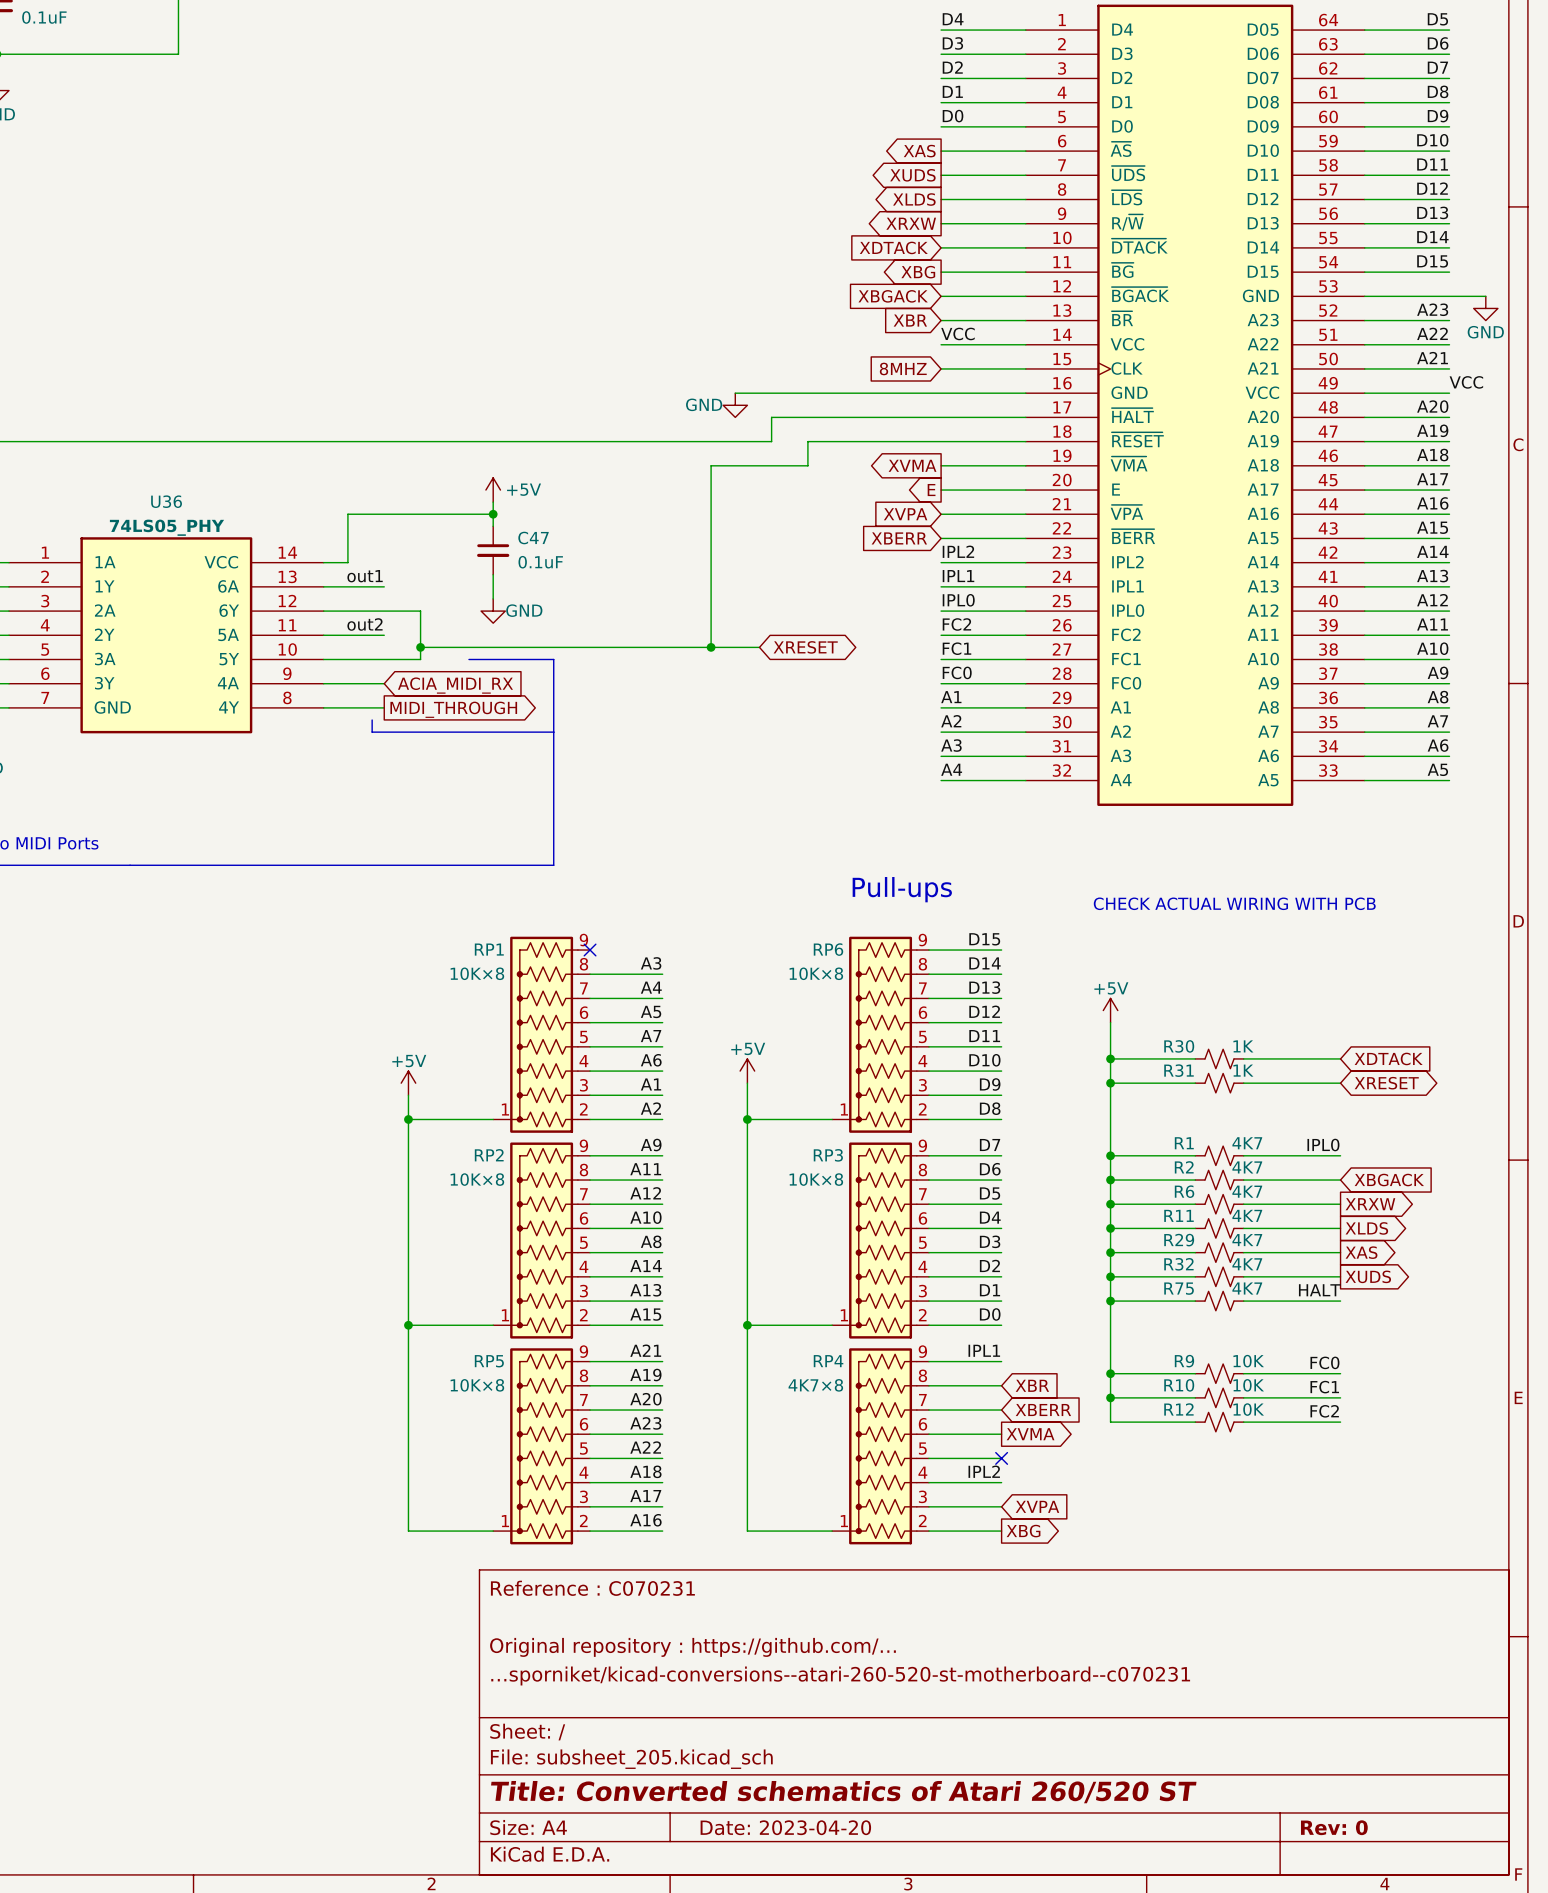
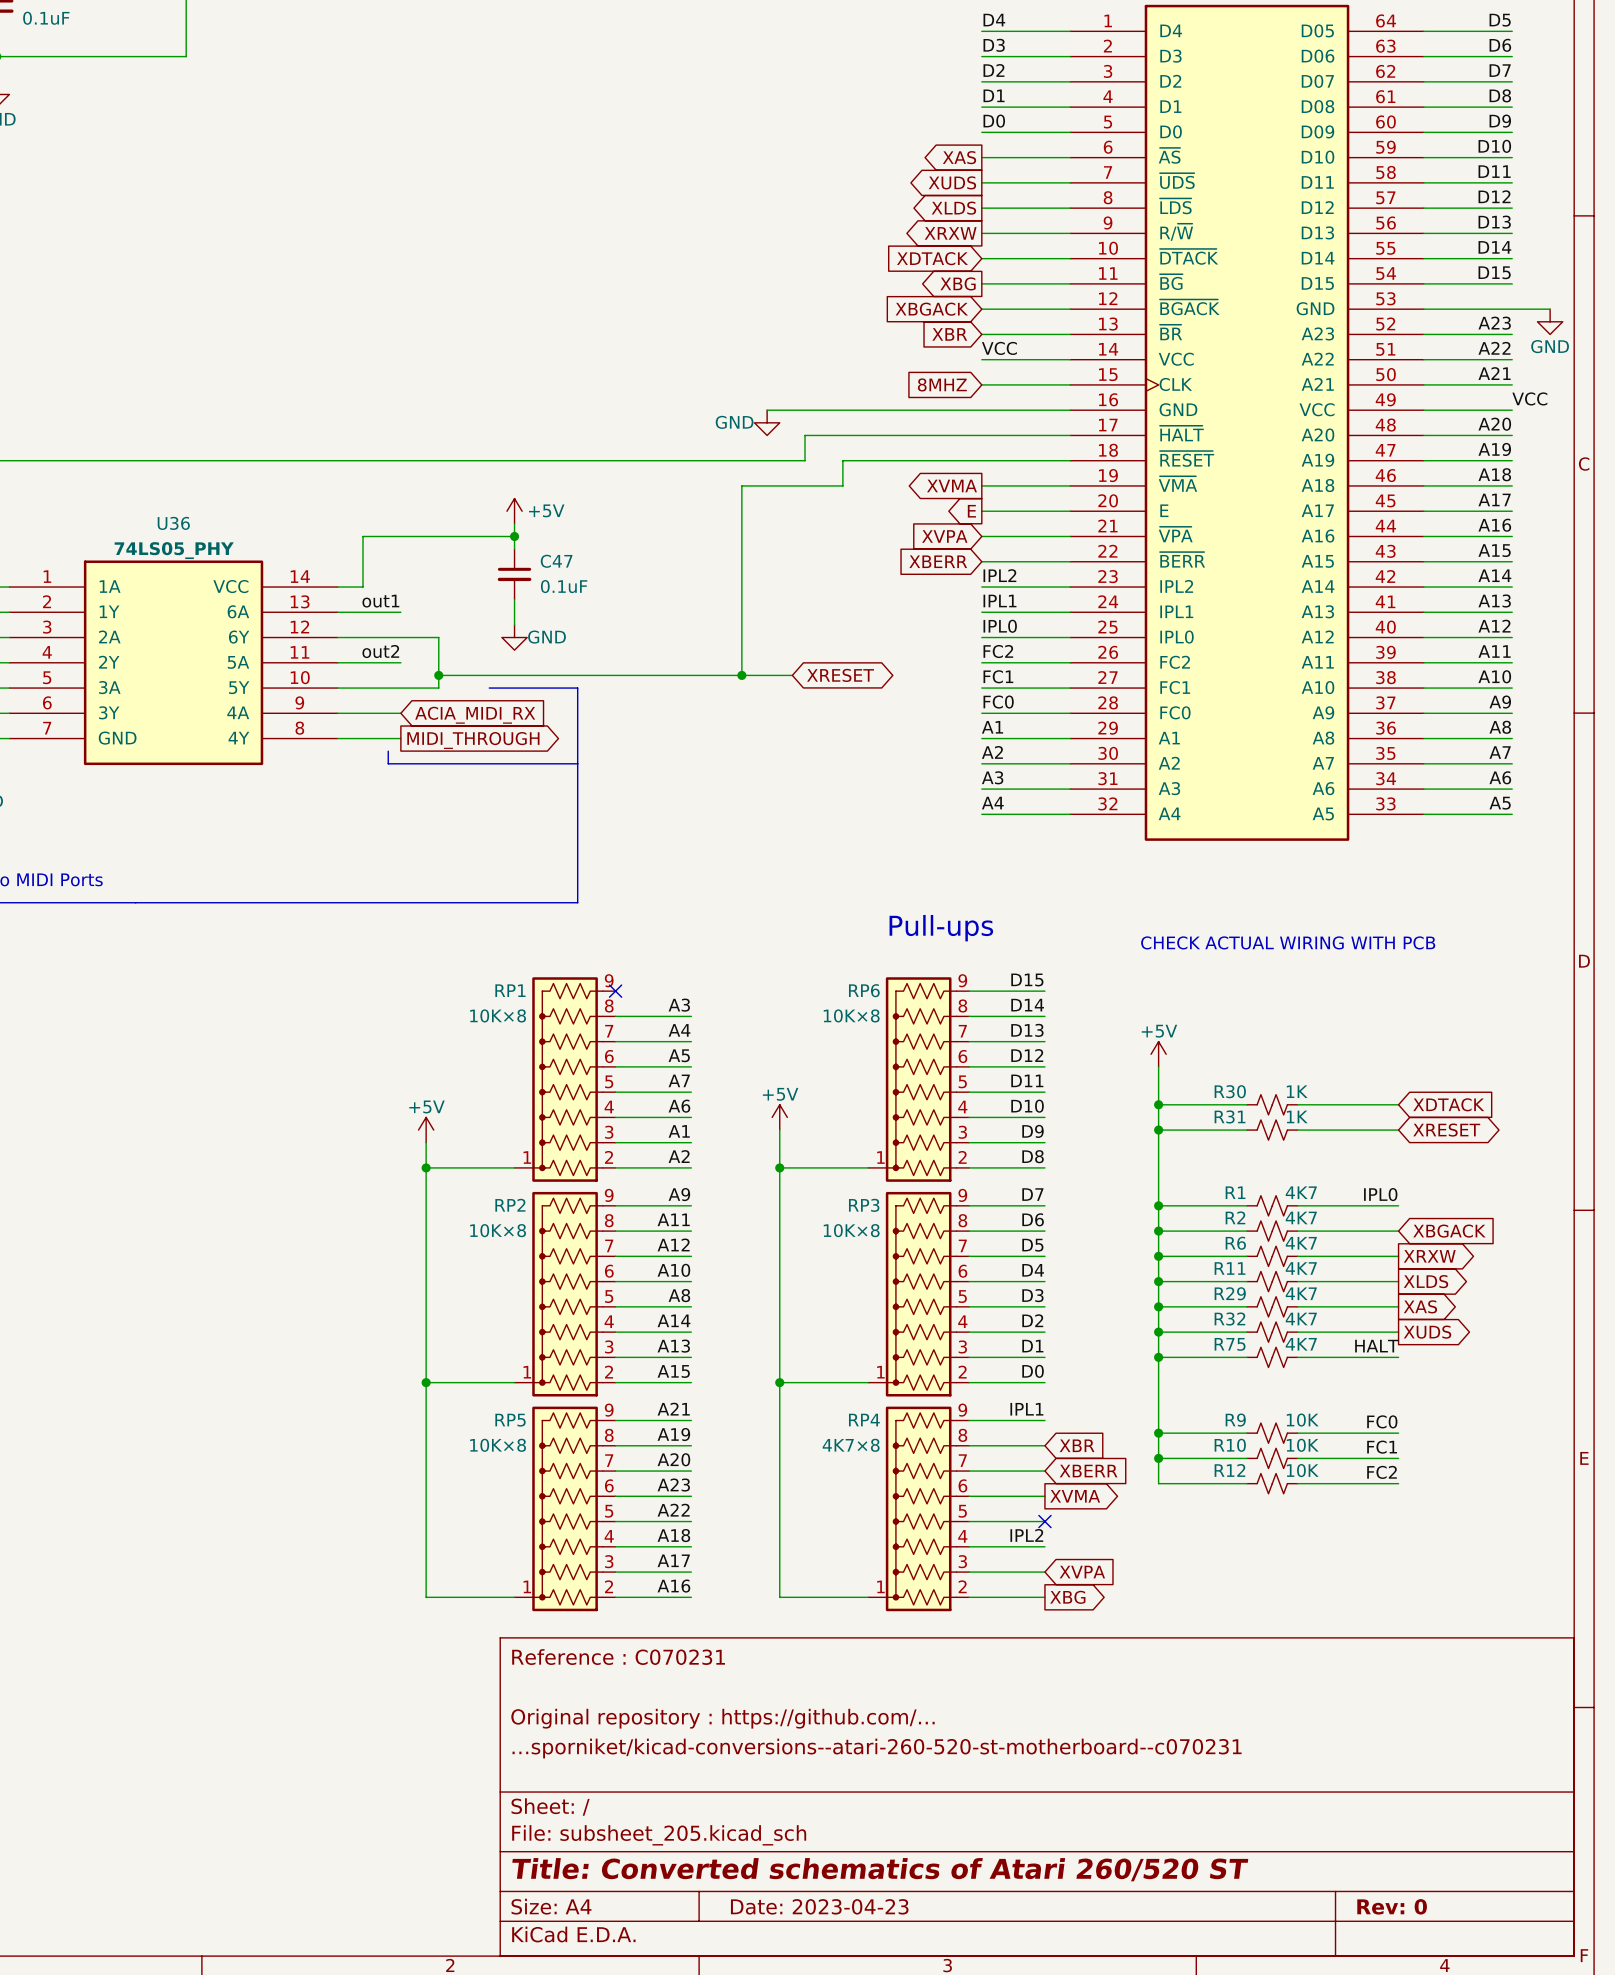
title block: Date: 2023-04-20 (785, 1827) -> Date: 2023-04-23 (819, 1906)

